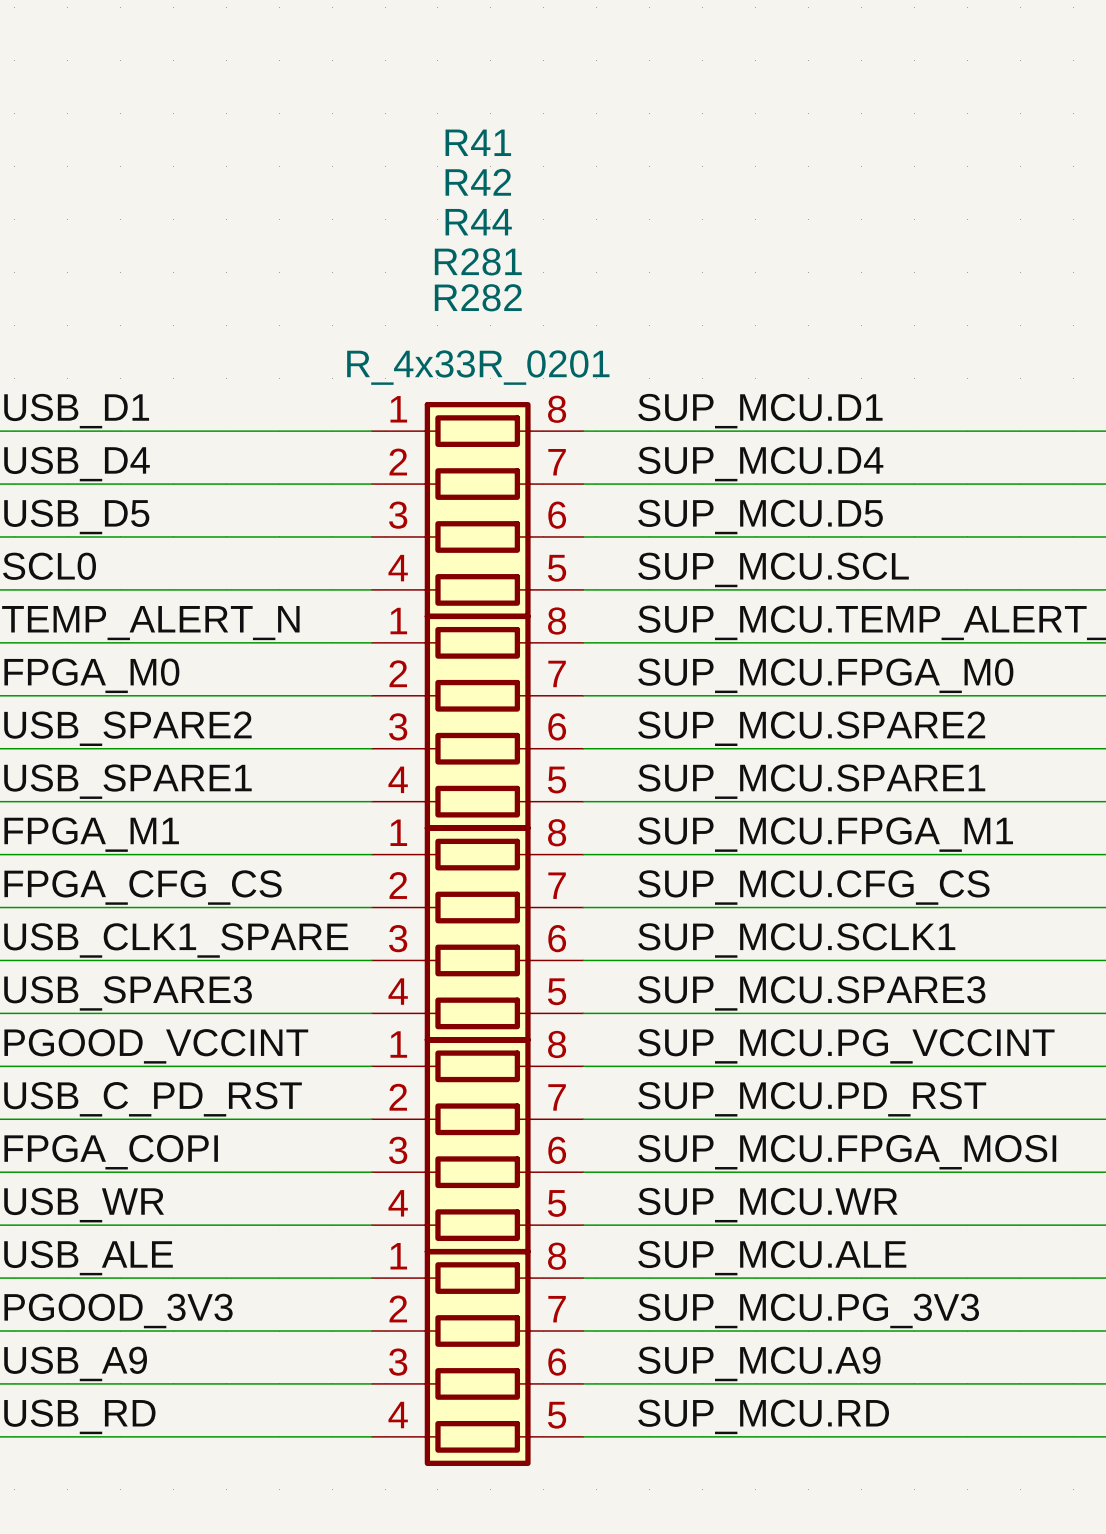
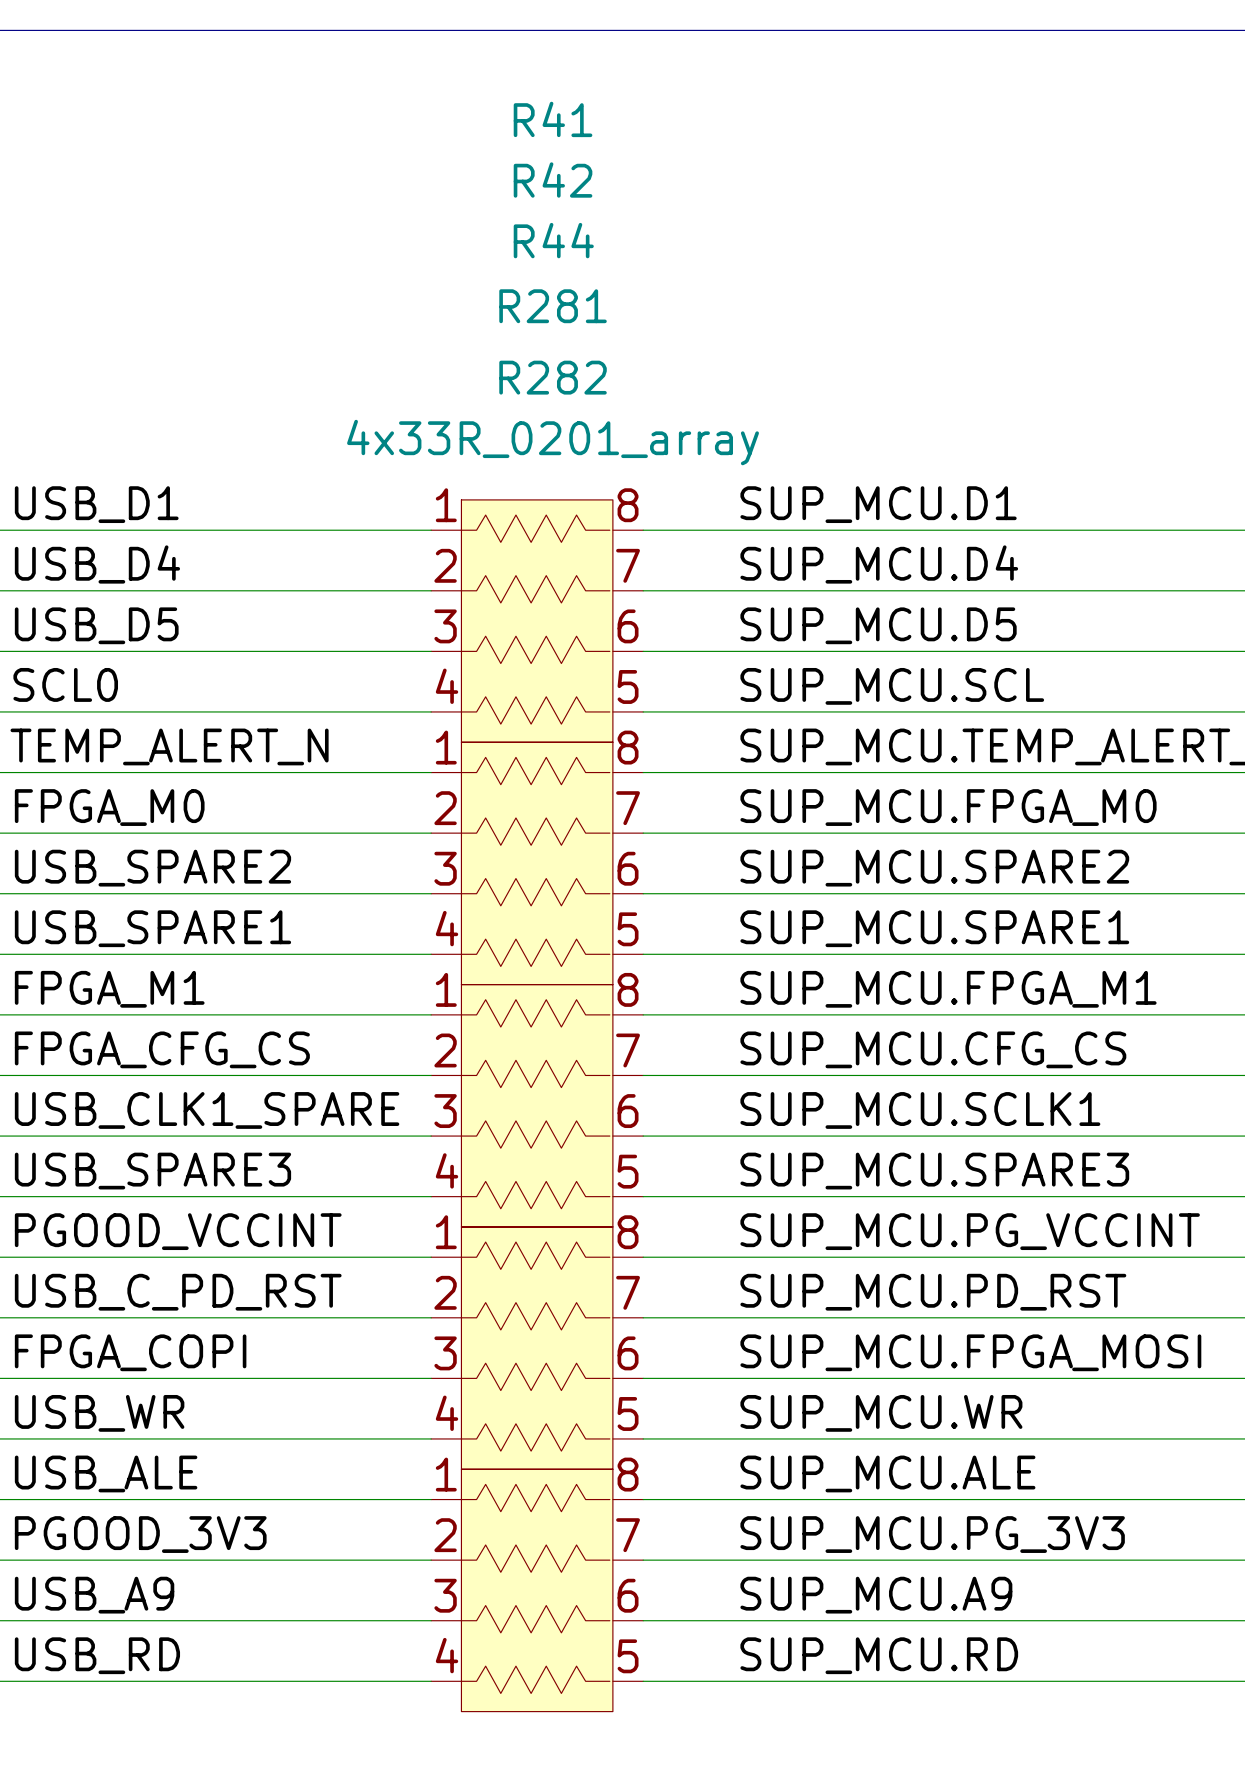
R41 name position: R41 (478, 142) -> R41 (553, 119)
R42 name position: R42 (478, 182) -> R42 (553, 180)
R44 name position: R44 (478, 222) -> R44 (553, 240)
R281 value: none -> 4x33R_0201_array (553, 442)
R41 text: R_4x33R_0201 (478, 367) -> none
R41 symbol: [371, 402, 584, 620] -> [431, 499, 644, 743]
R42 symbol: [371, 613, 584, 831] -> [431, 742, 644, 985]
R44 symbol: [371, 825, 584, 1043] -> [431, 984, 644, 1227]
R281 symbol: [371, 1037, 584, 1255] -> [431, 1226, 644, 1470]
R282 symbol: [371, 1248, 584, 1466] -> [431, 1469, 644, 1712]

